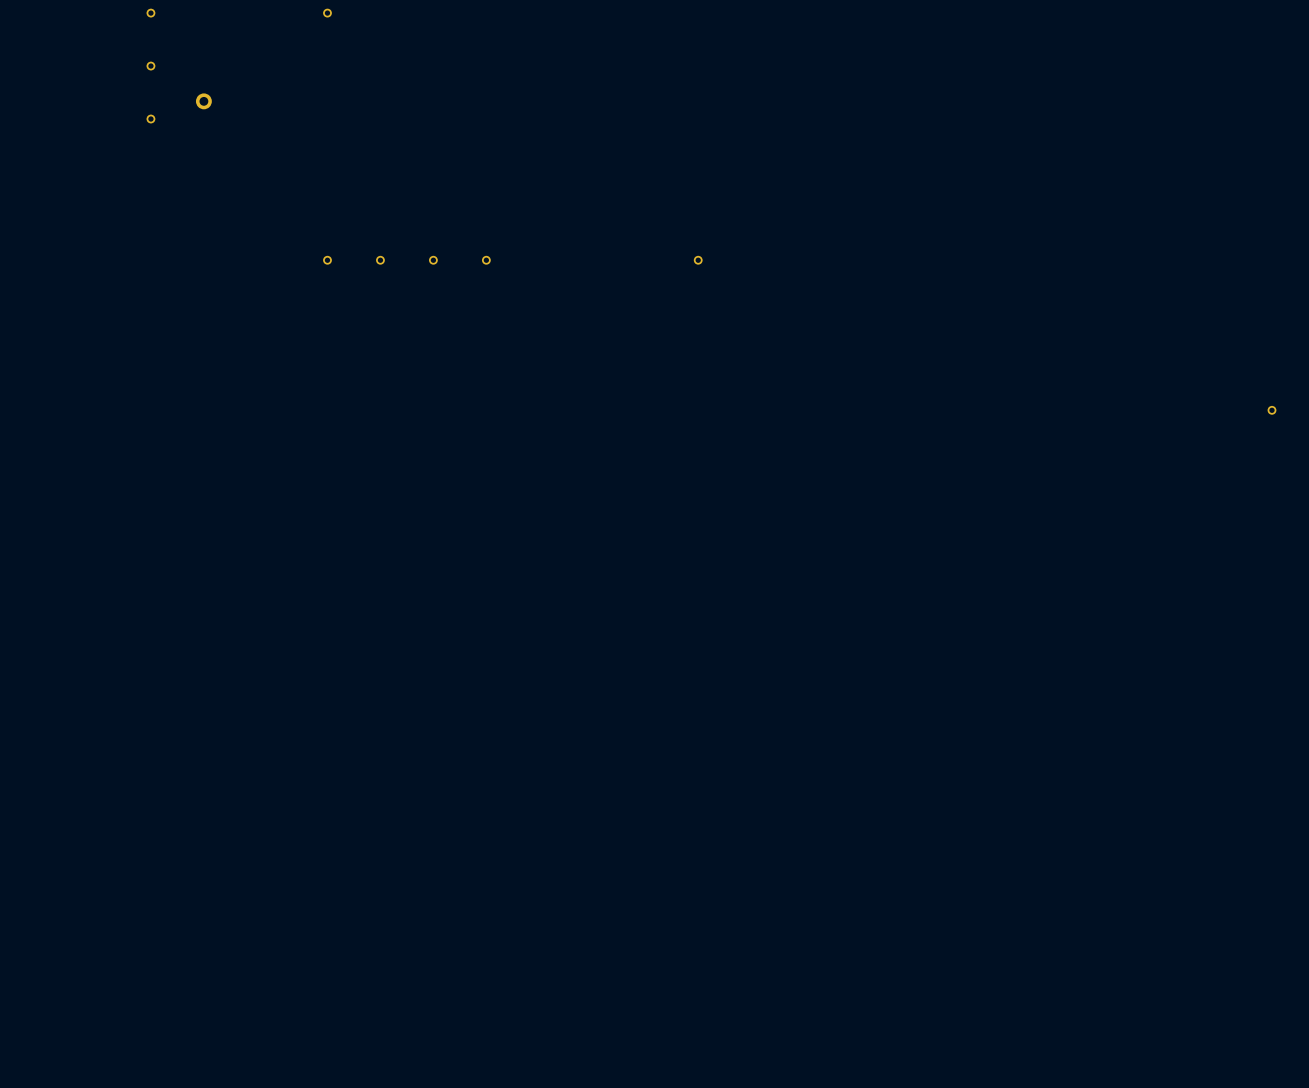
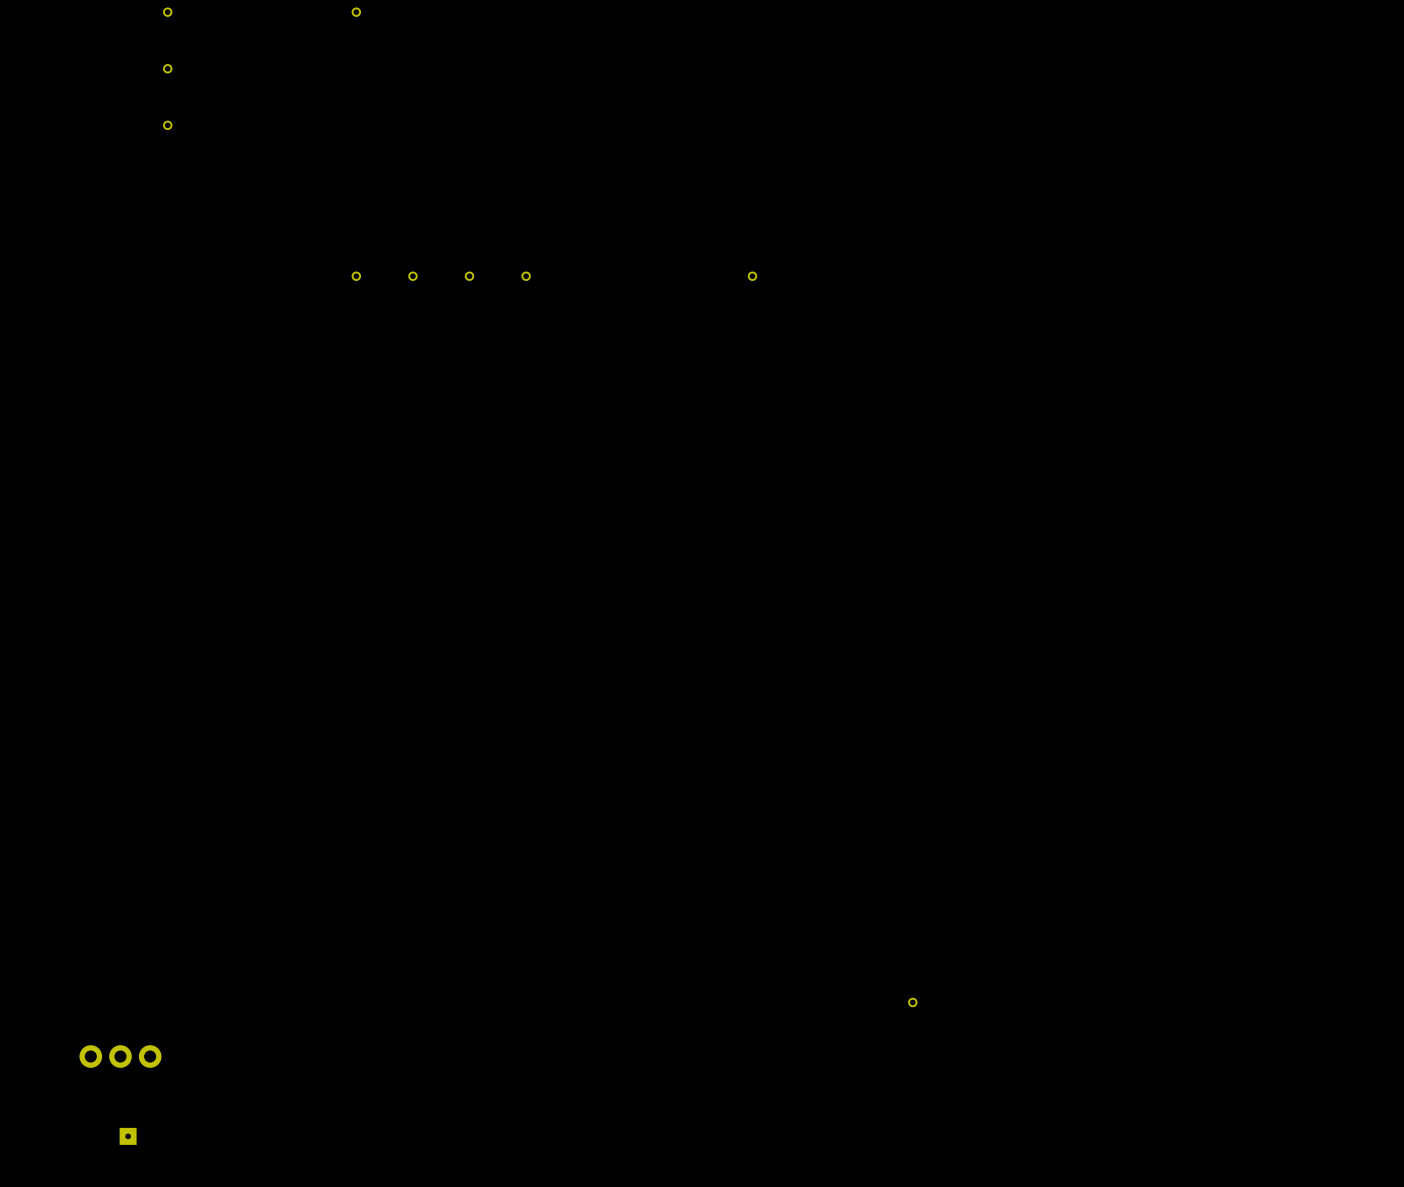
part: (203, 101) -> none
part: (1271, 410) -> none
part: none -> (912, 1002)
part: none -> (120, 1056)
part: none -> (128, 1136)

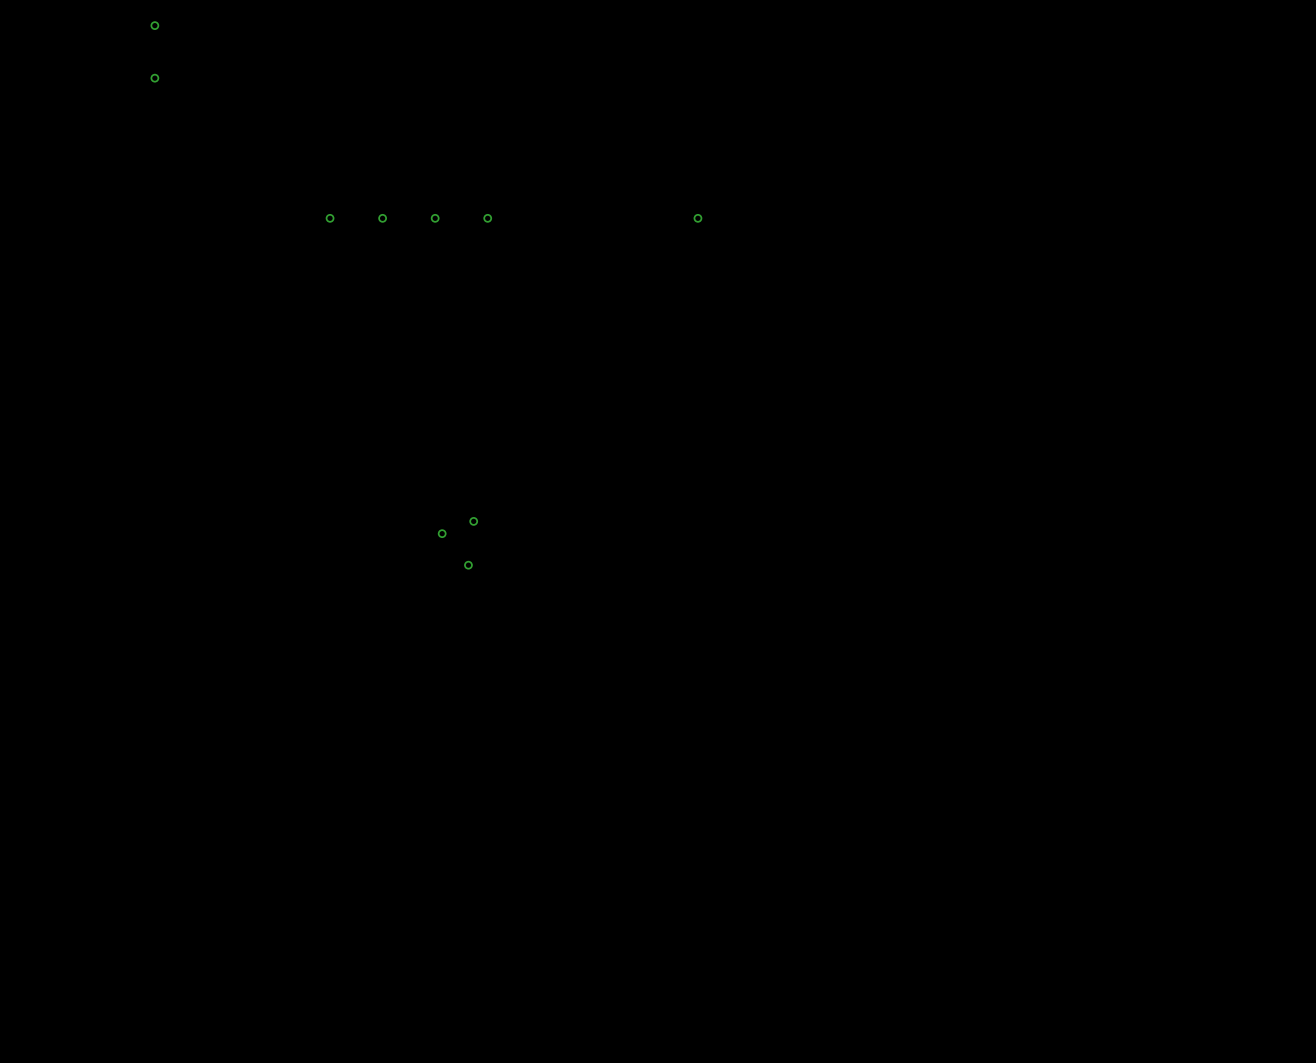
part: none -> (473, 521)
part: none -> (442, 533)
part: none -> (468, 565)
part: (912, 1002) -> none
part: (120, 1056) -> none
part: (128, 1136) -> none

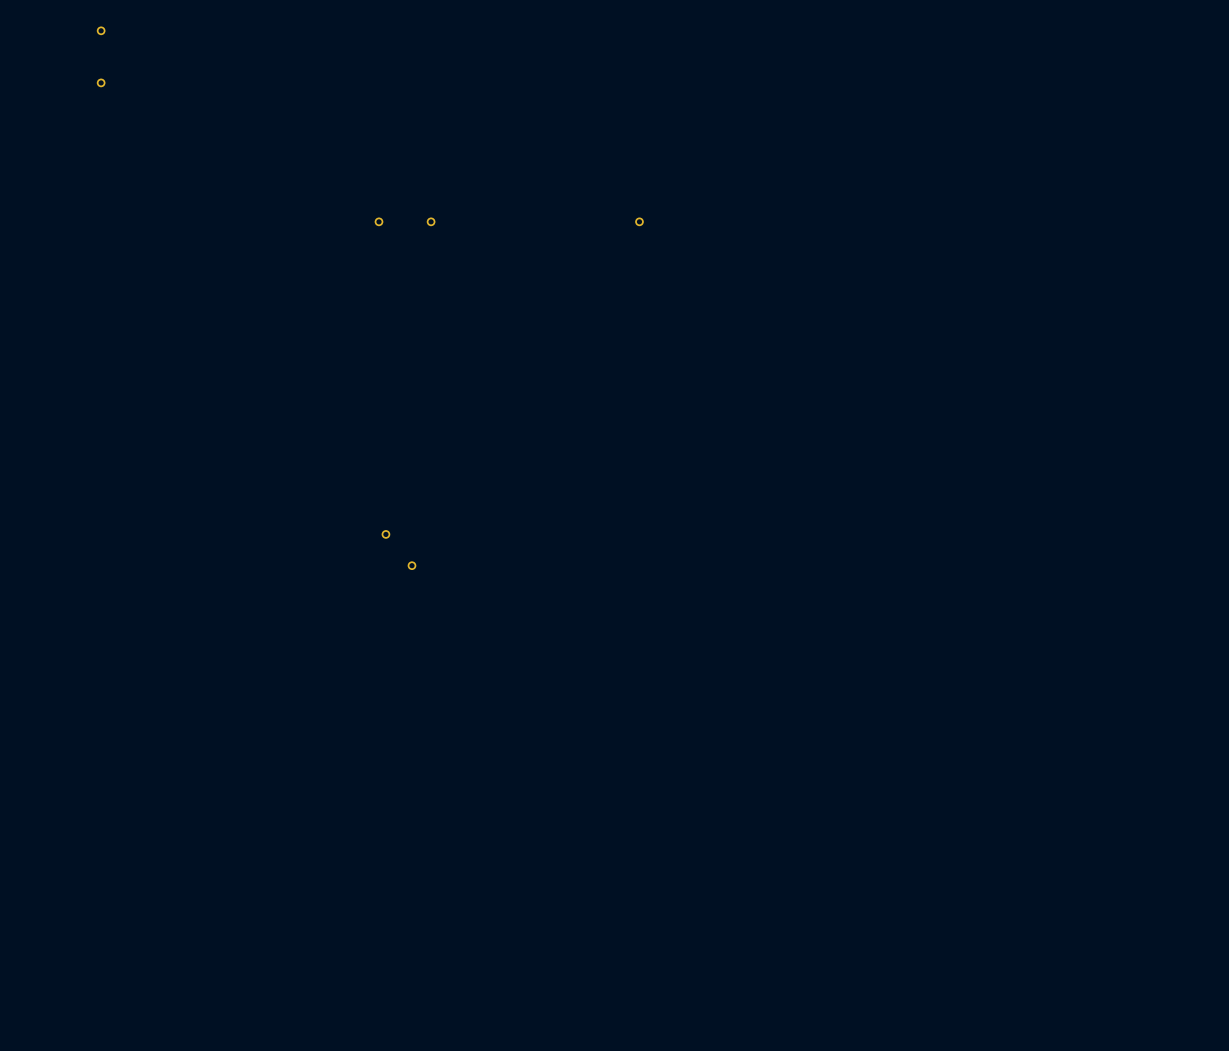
part: (330, 218) -> none
part: (382, 218) -> none
part: (473, 521) -> none

